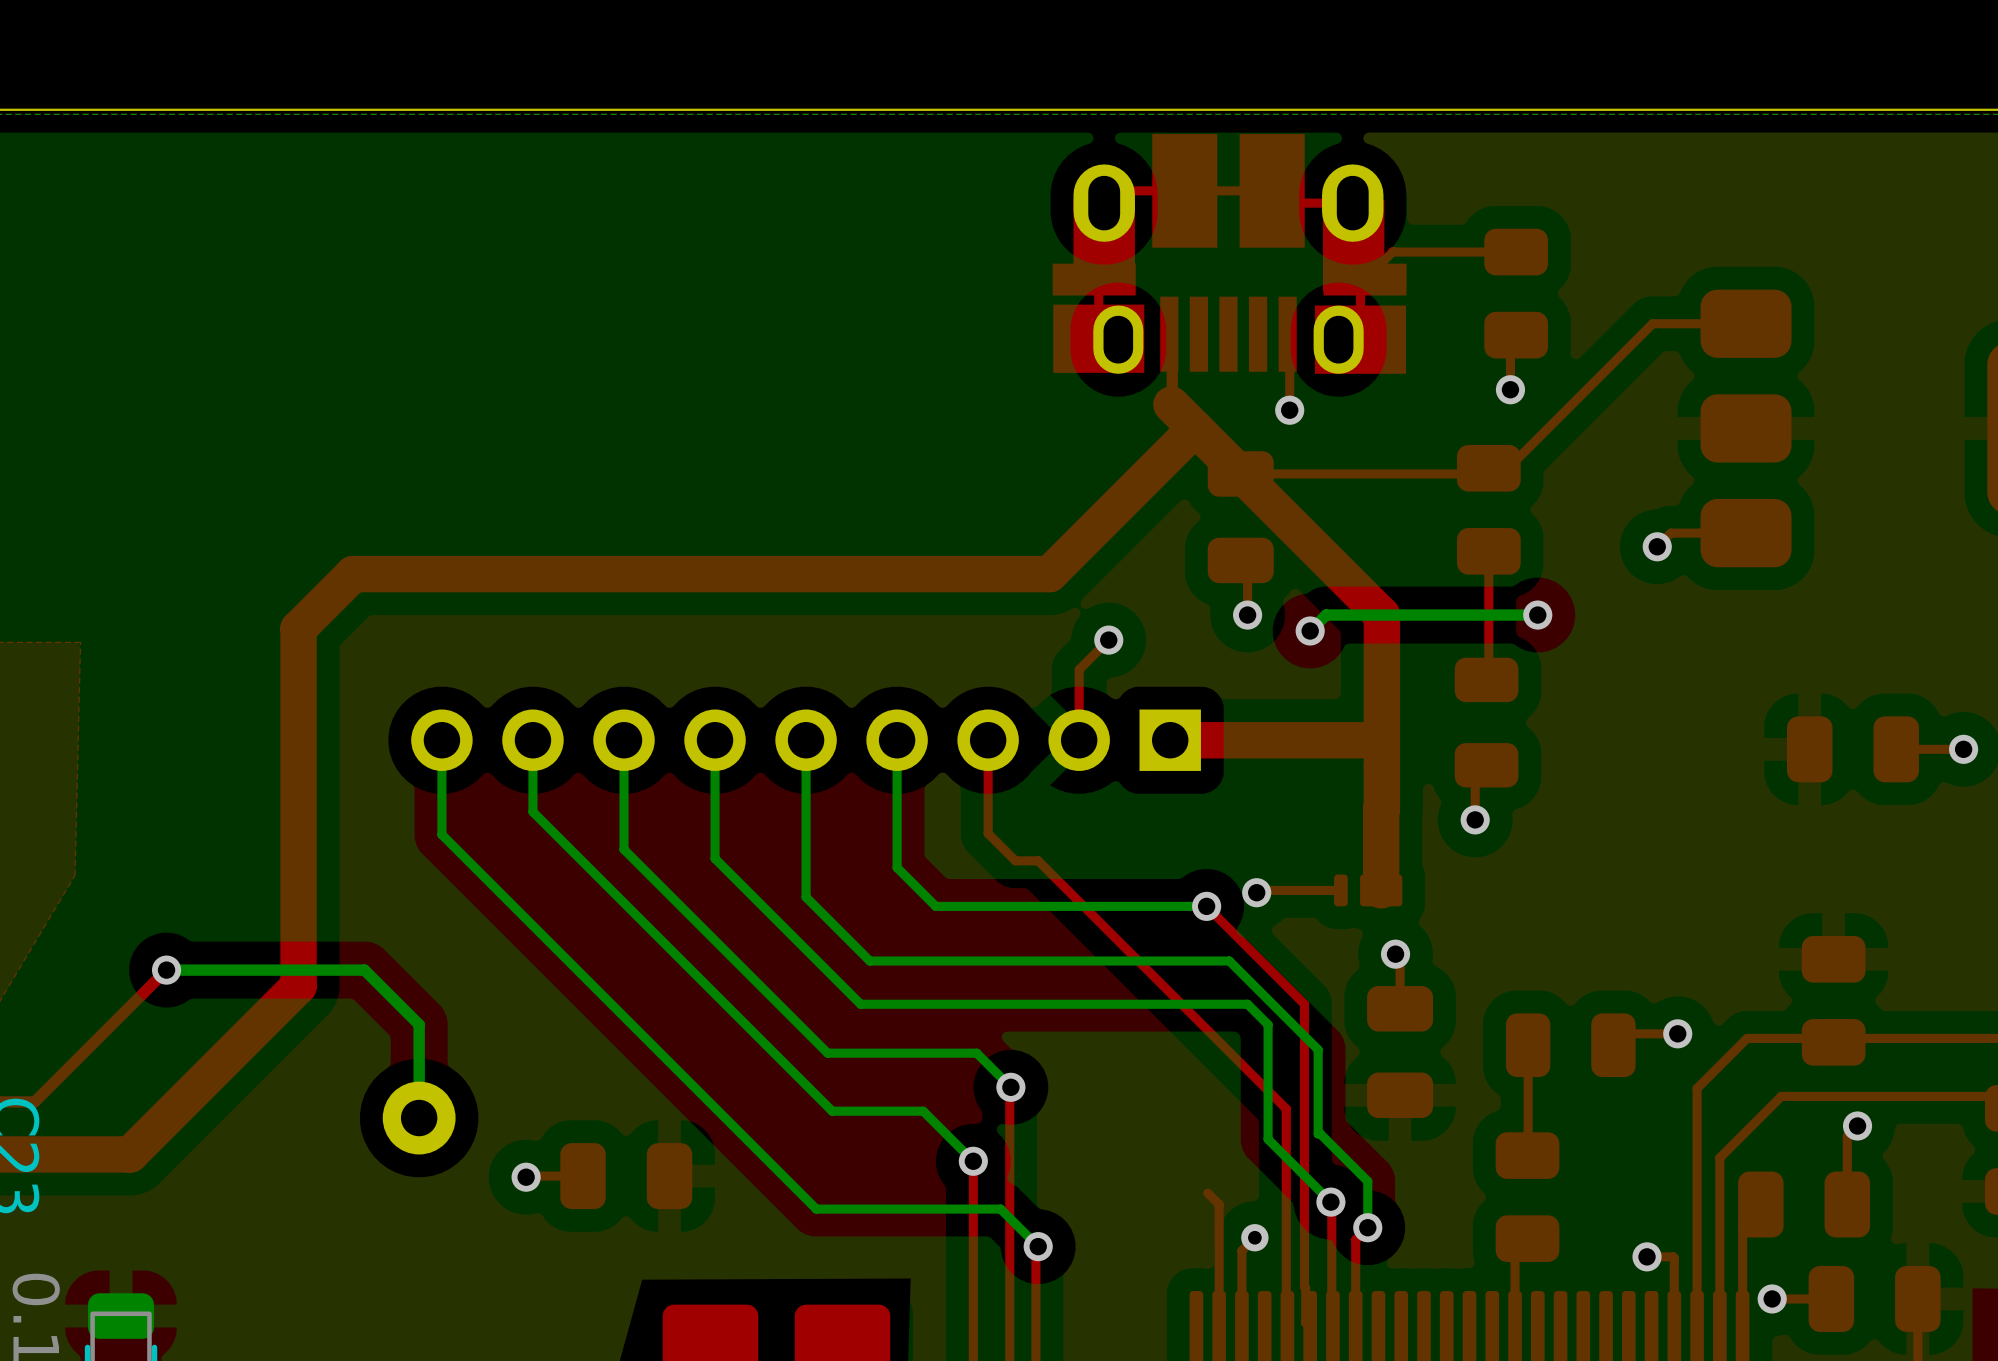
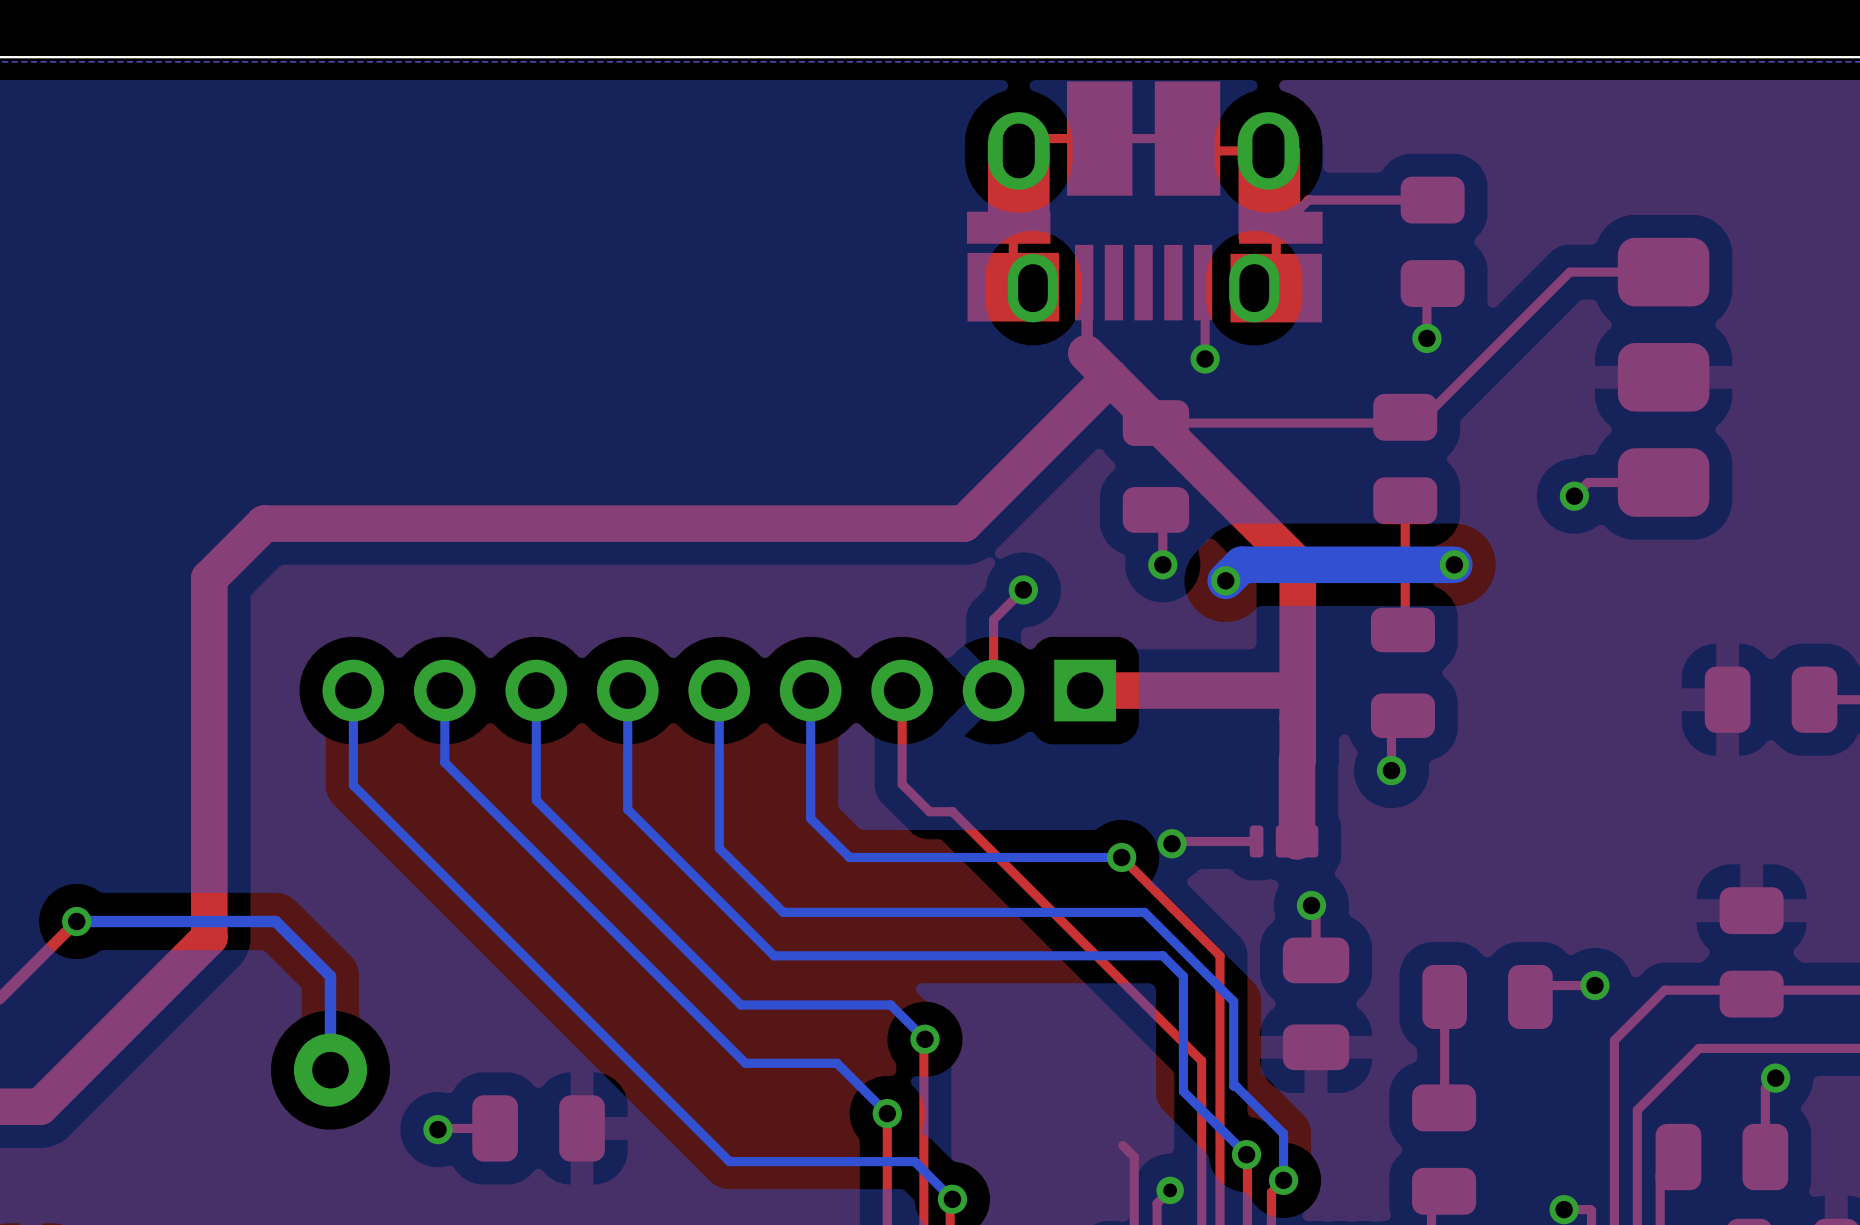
bottom track width: thin (1537, 615) (1326, 615) (1310, 630) -> thick (1454, 564) (1241, 564) (1225, 580)

